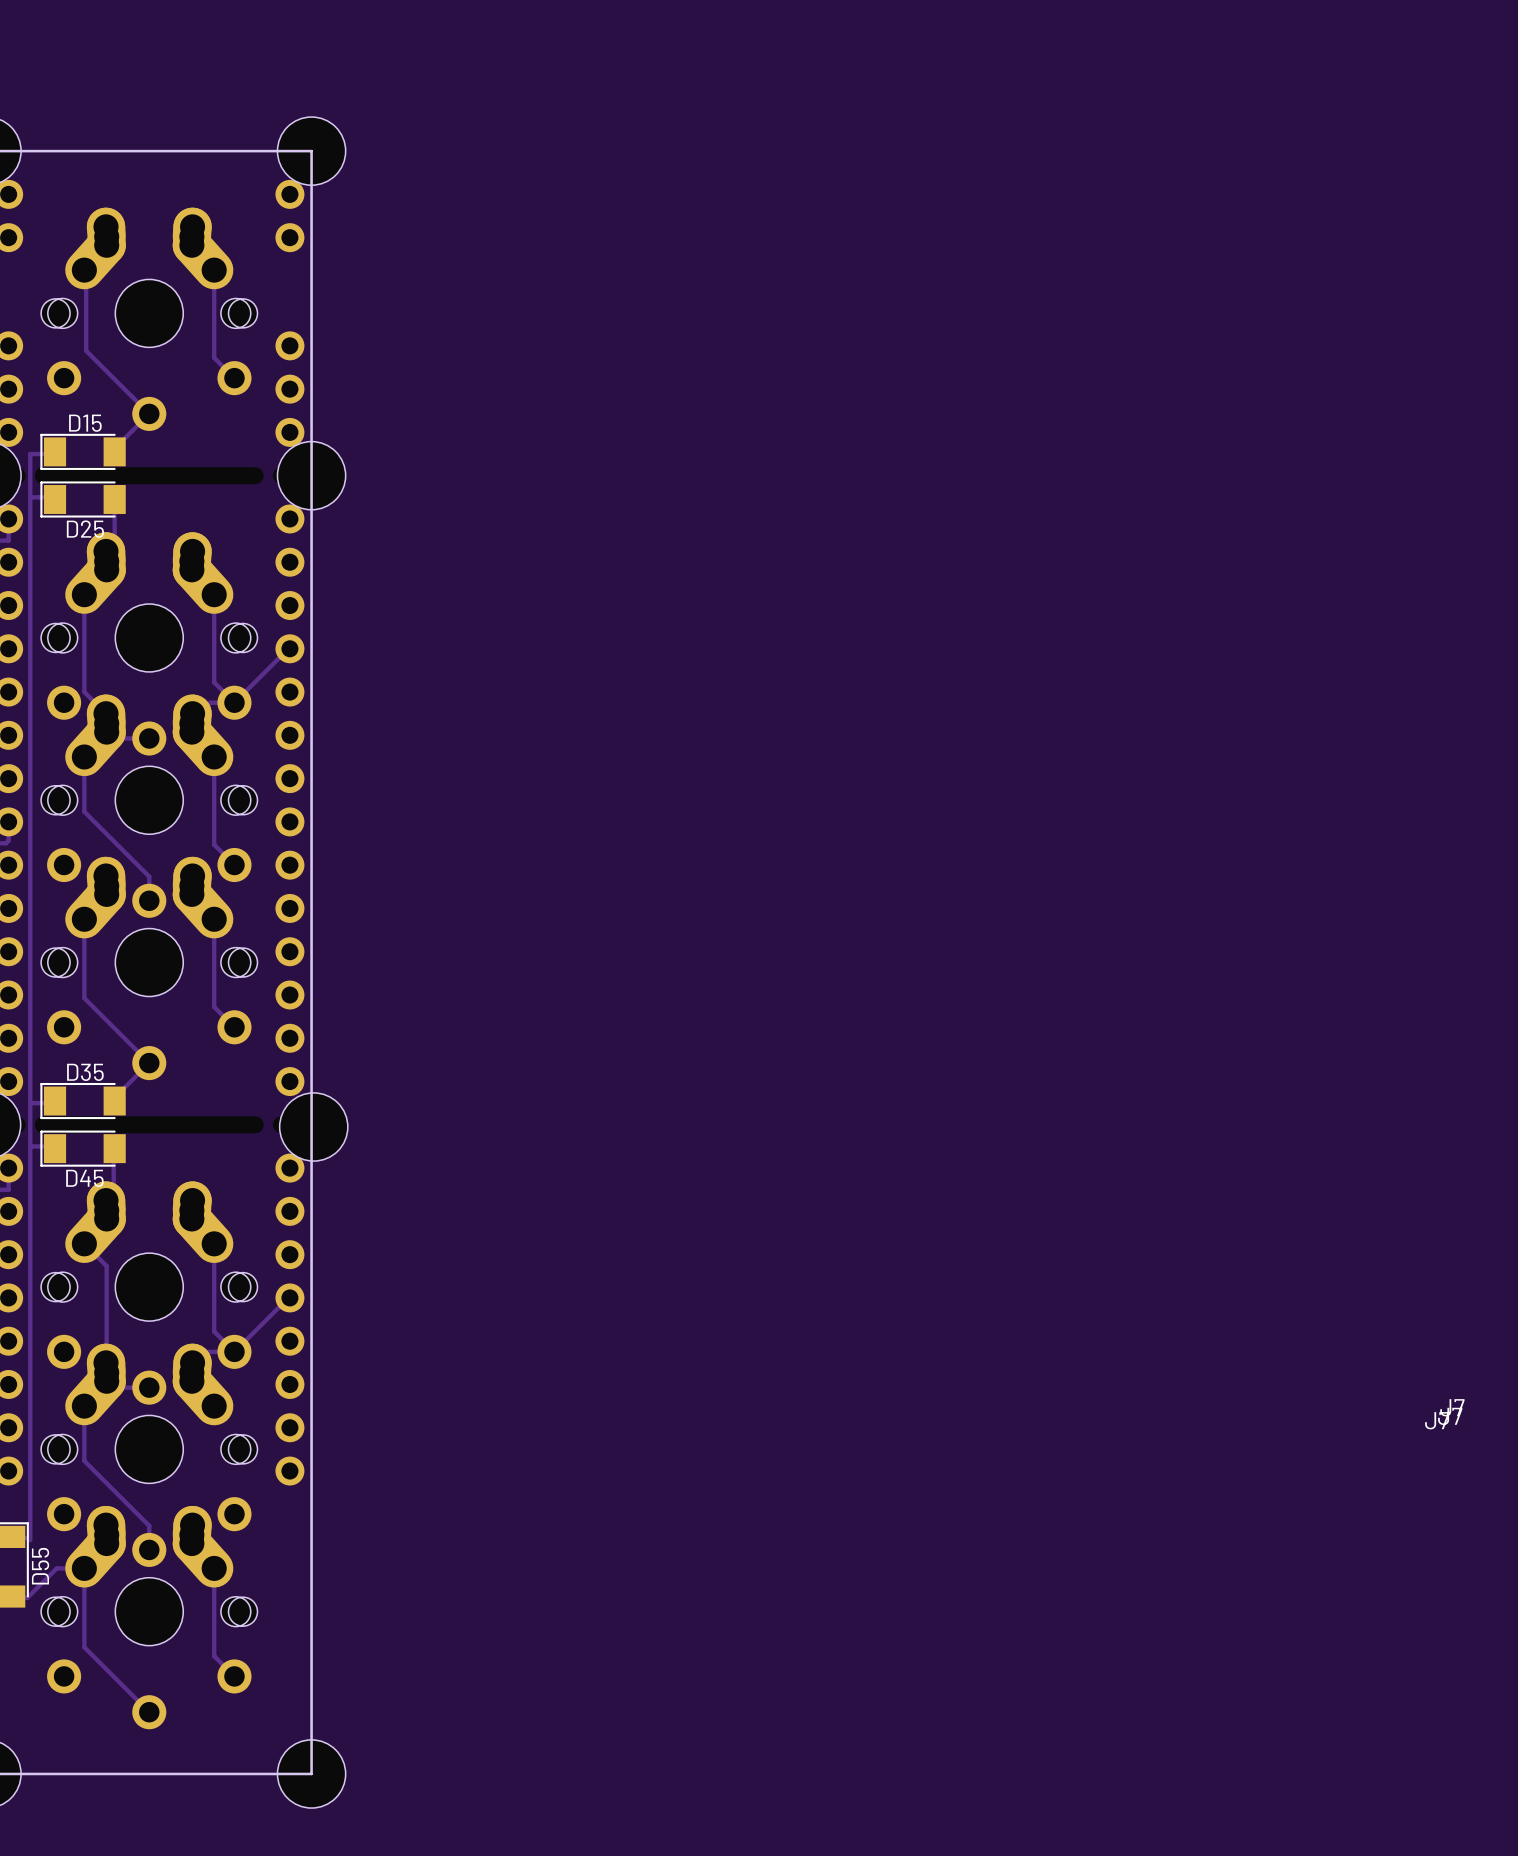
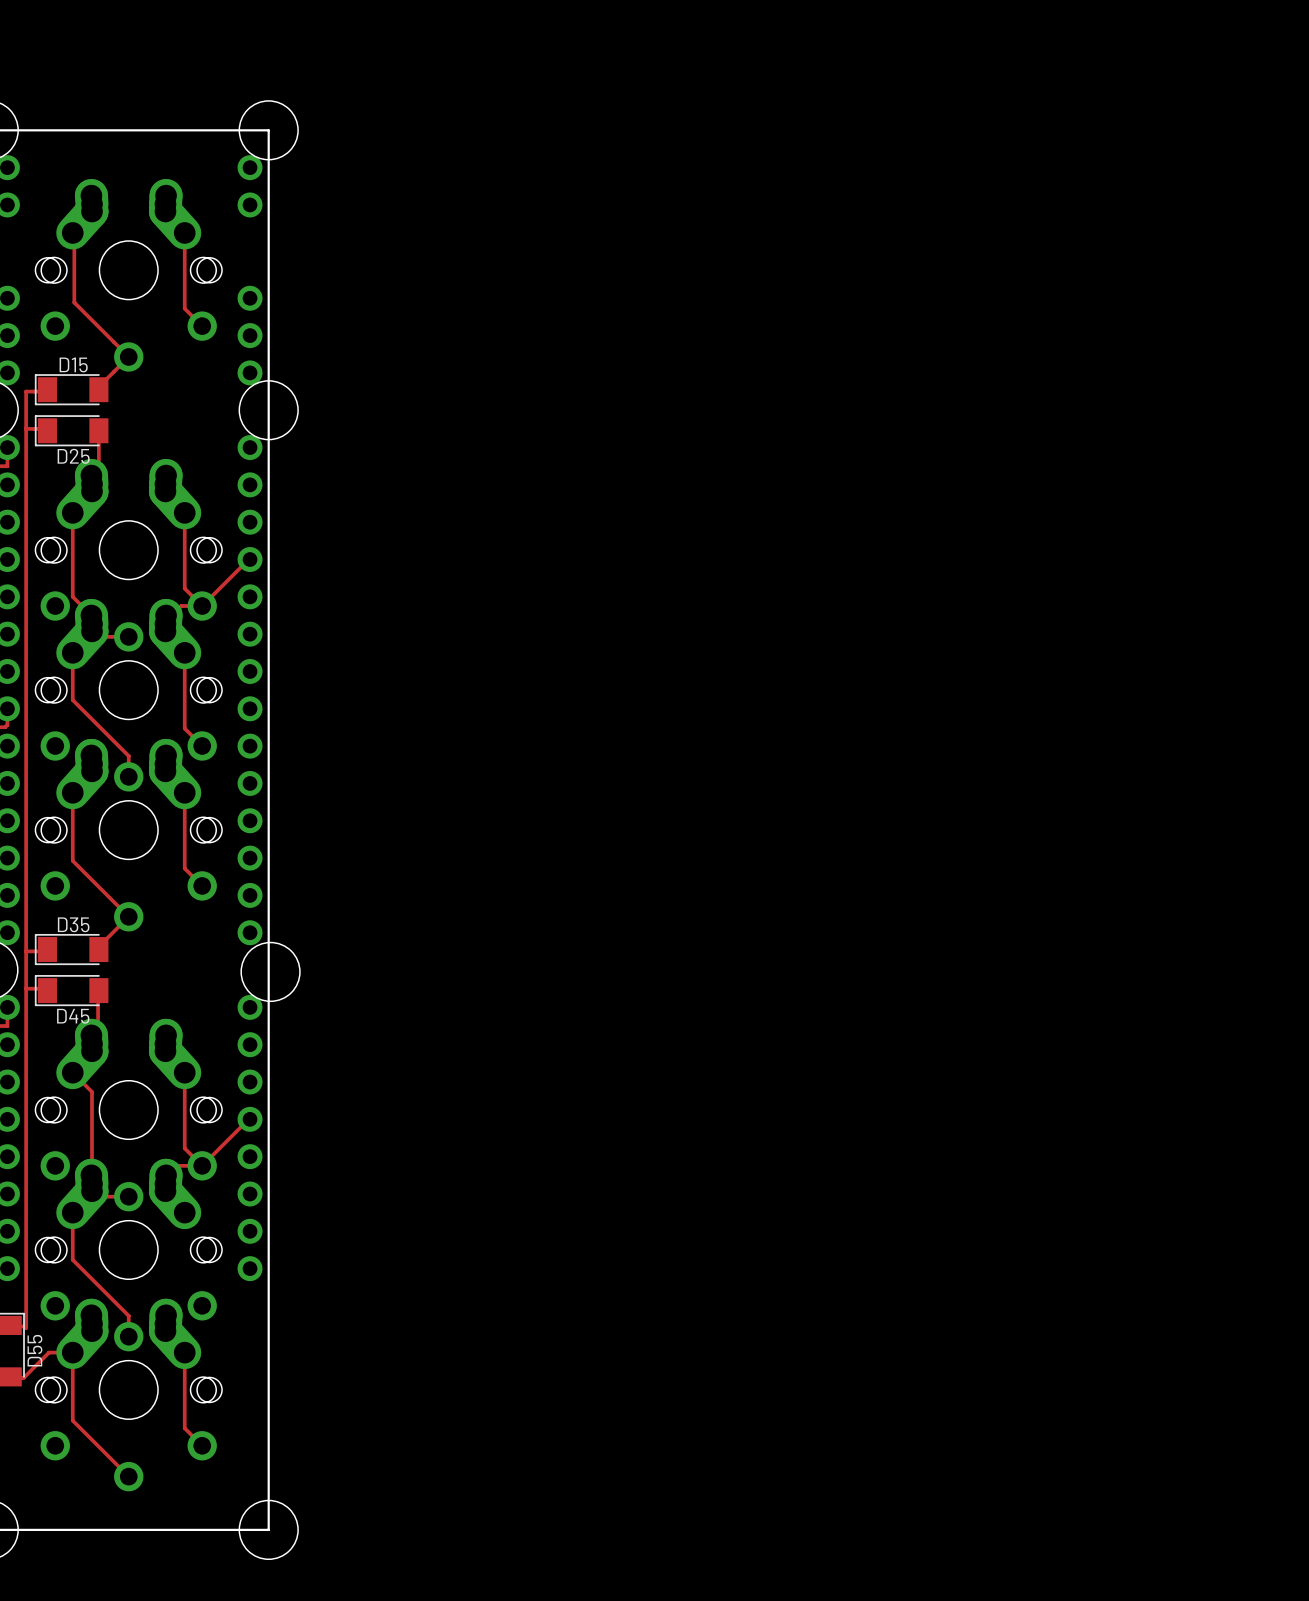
drawing: [1425, 1399, 1465, 1430] -> none

